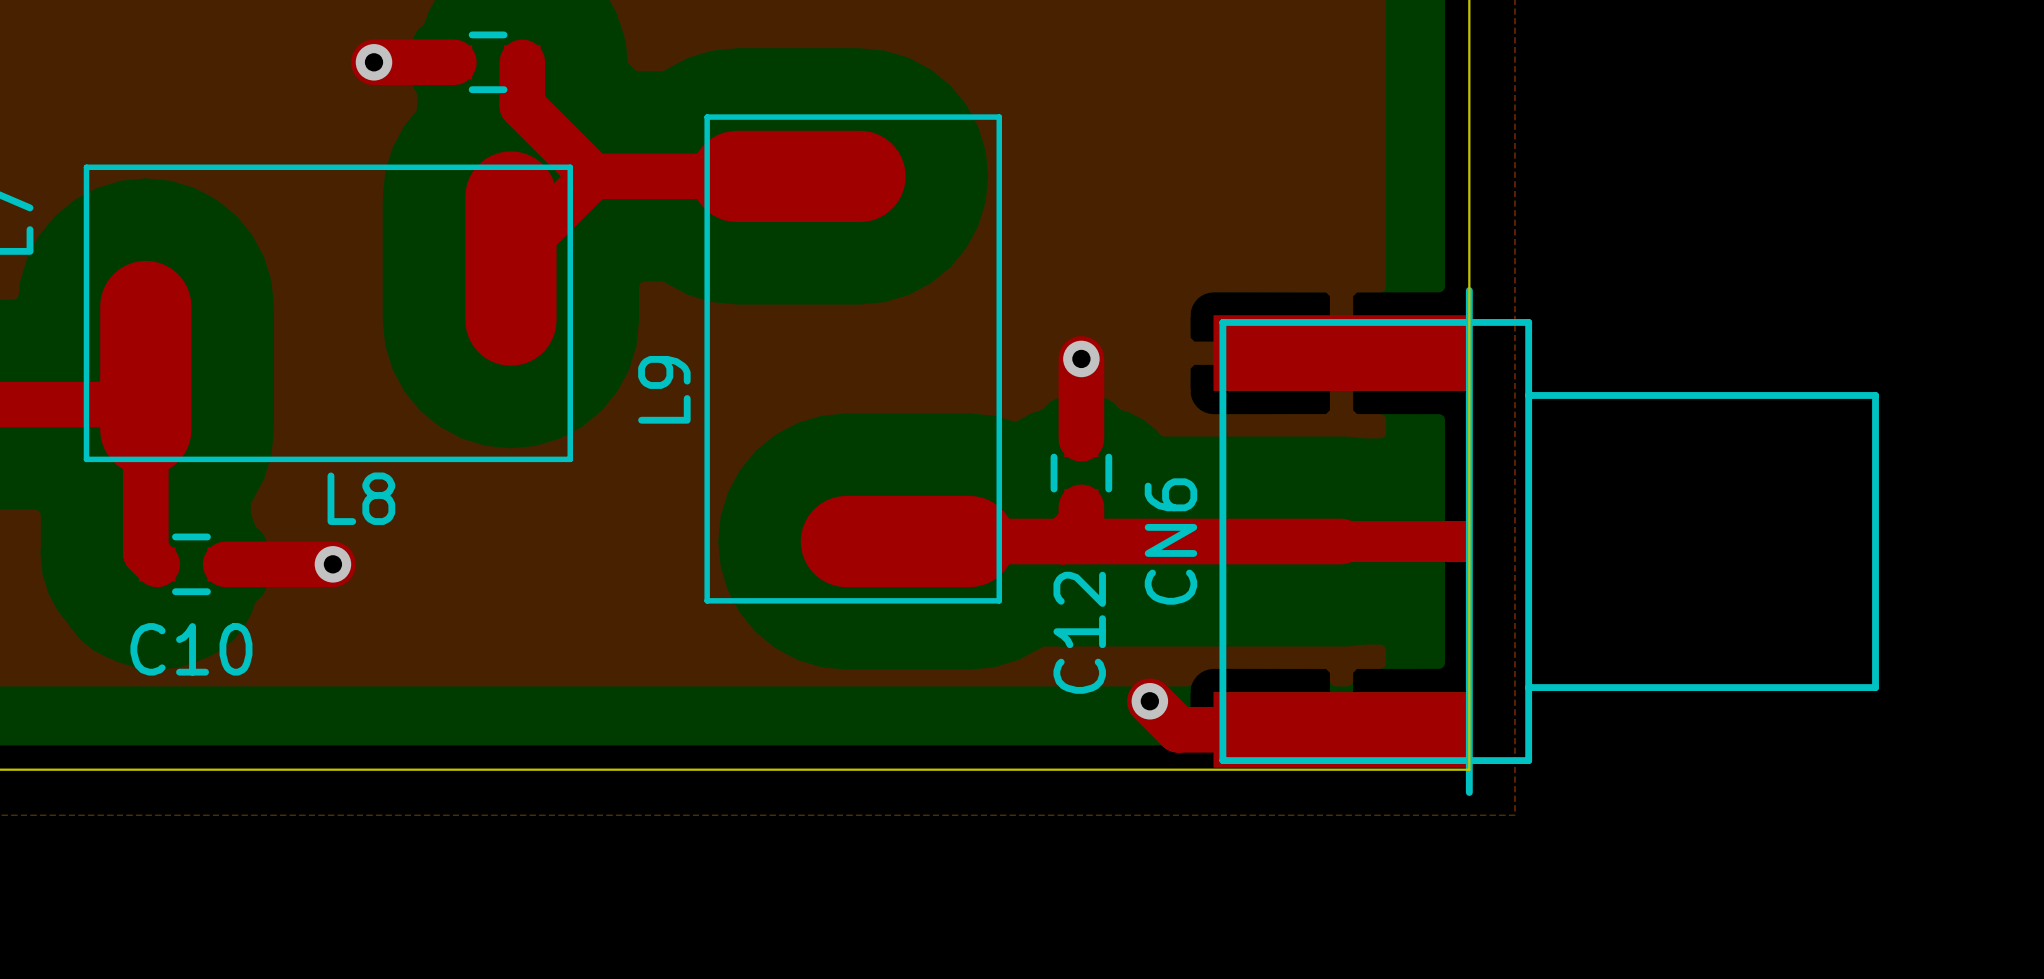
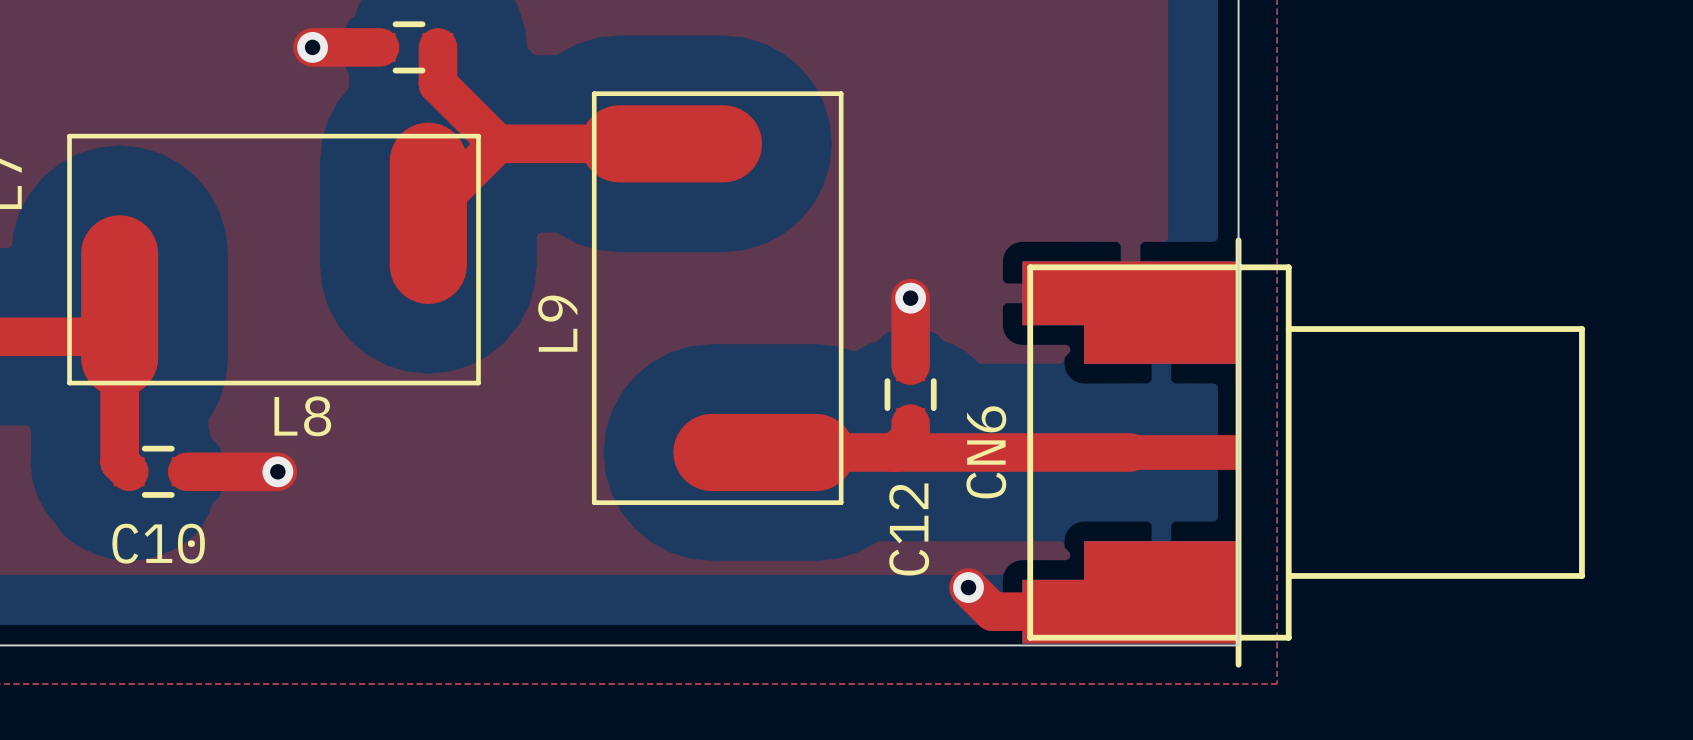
CN6 footprint: [1213, 287, 1879, 796] -> [1022, 237, 1585, 668]

